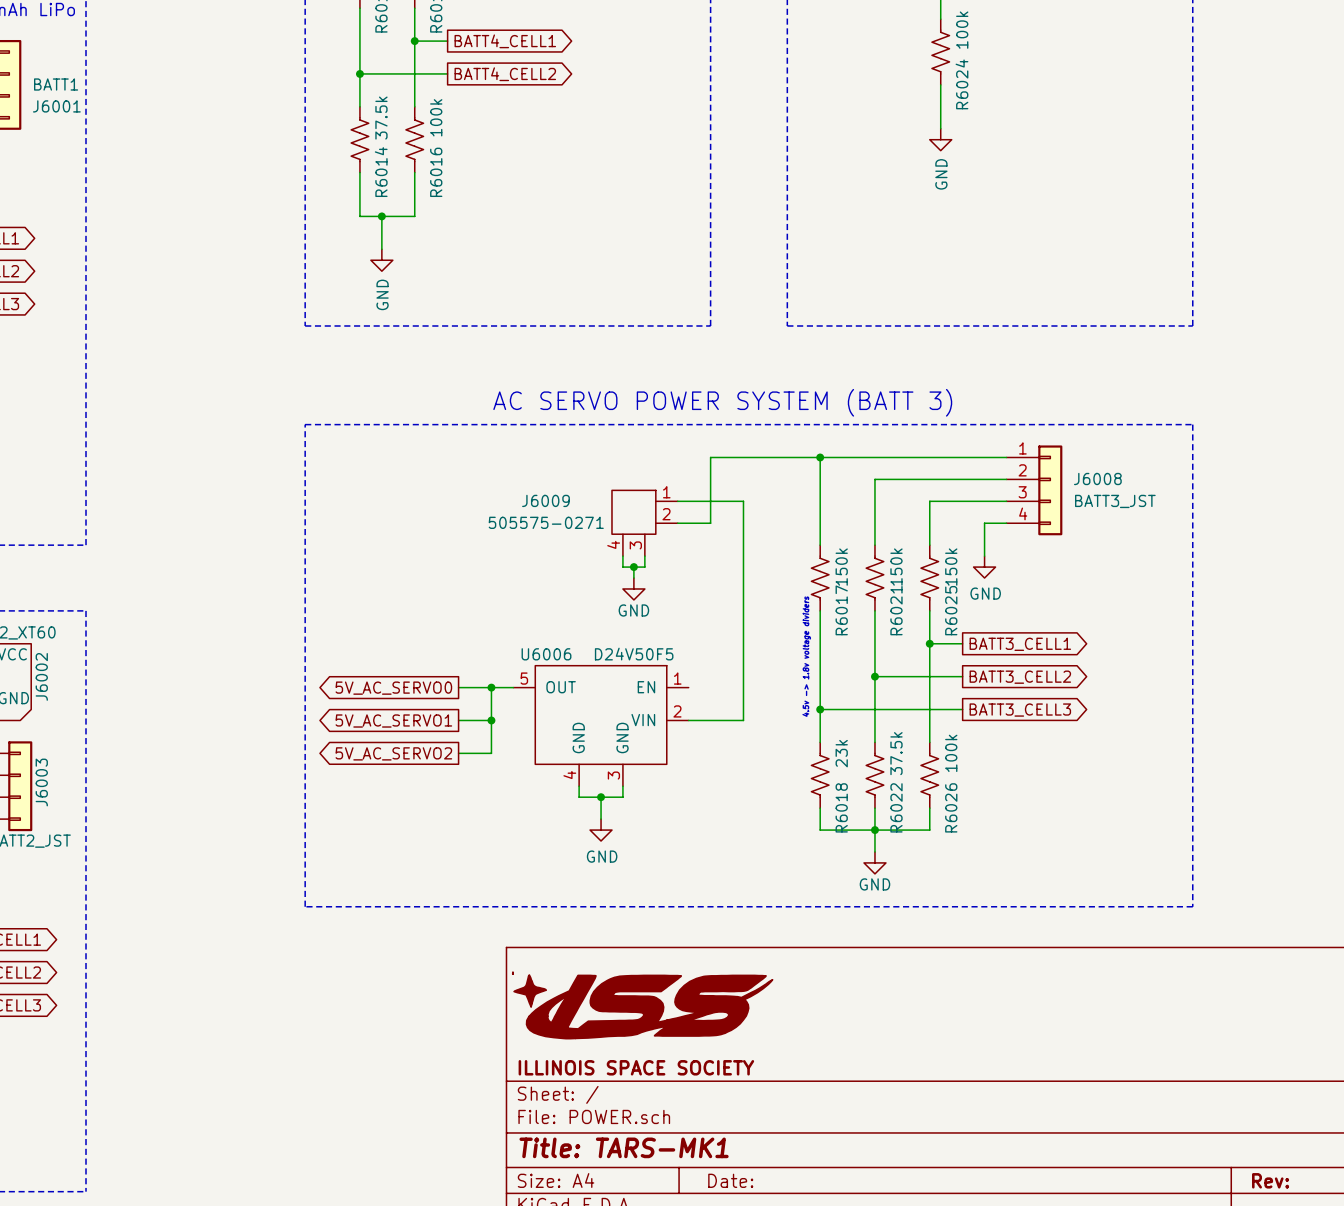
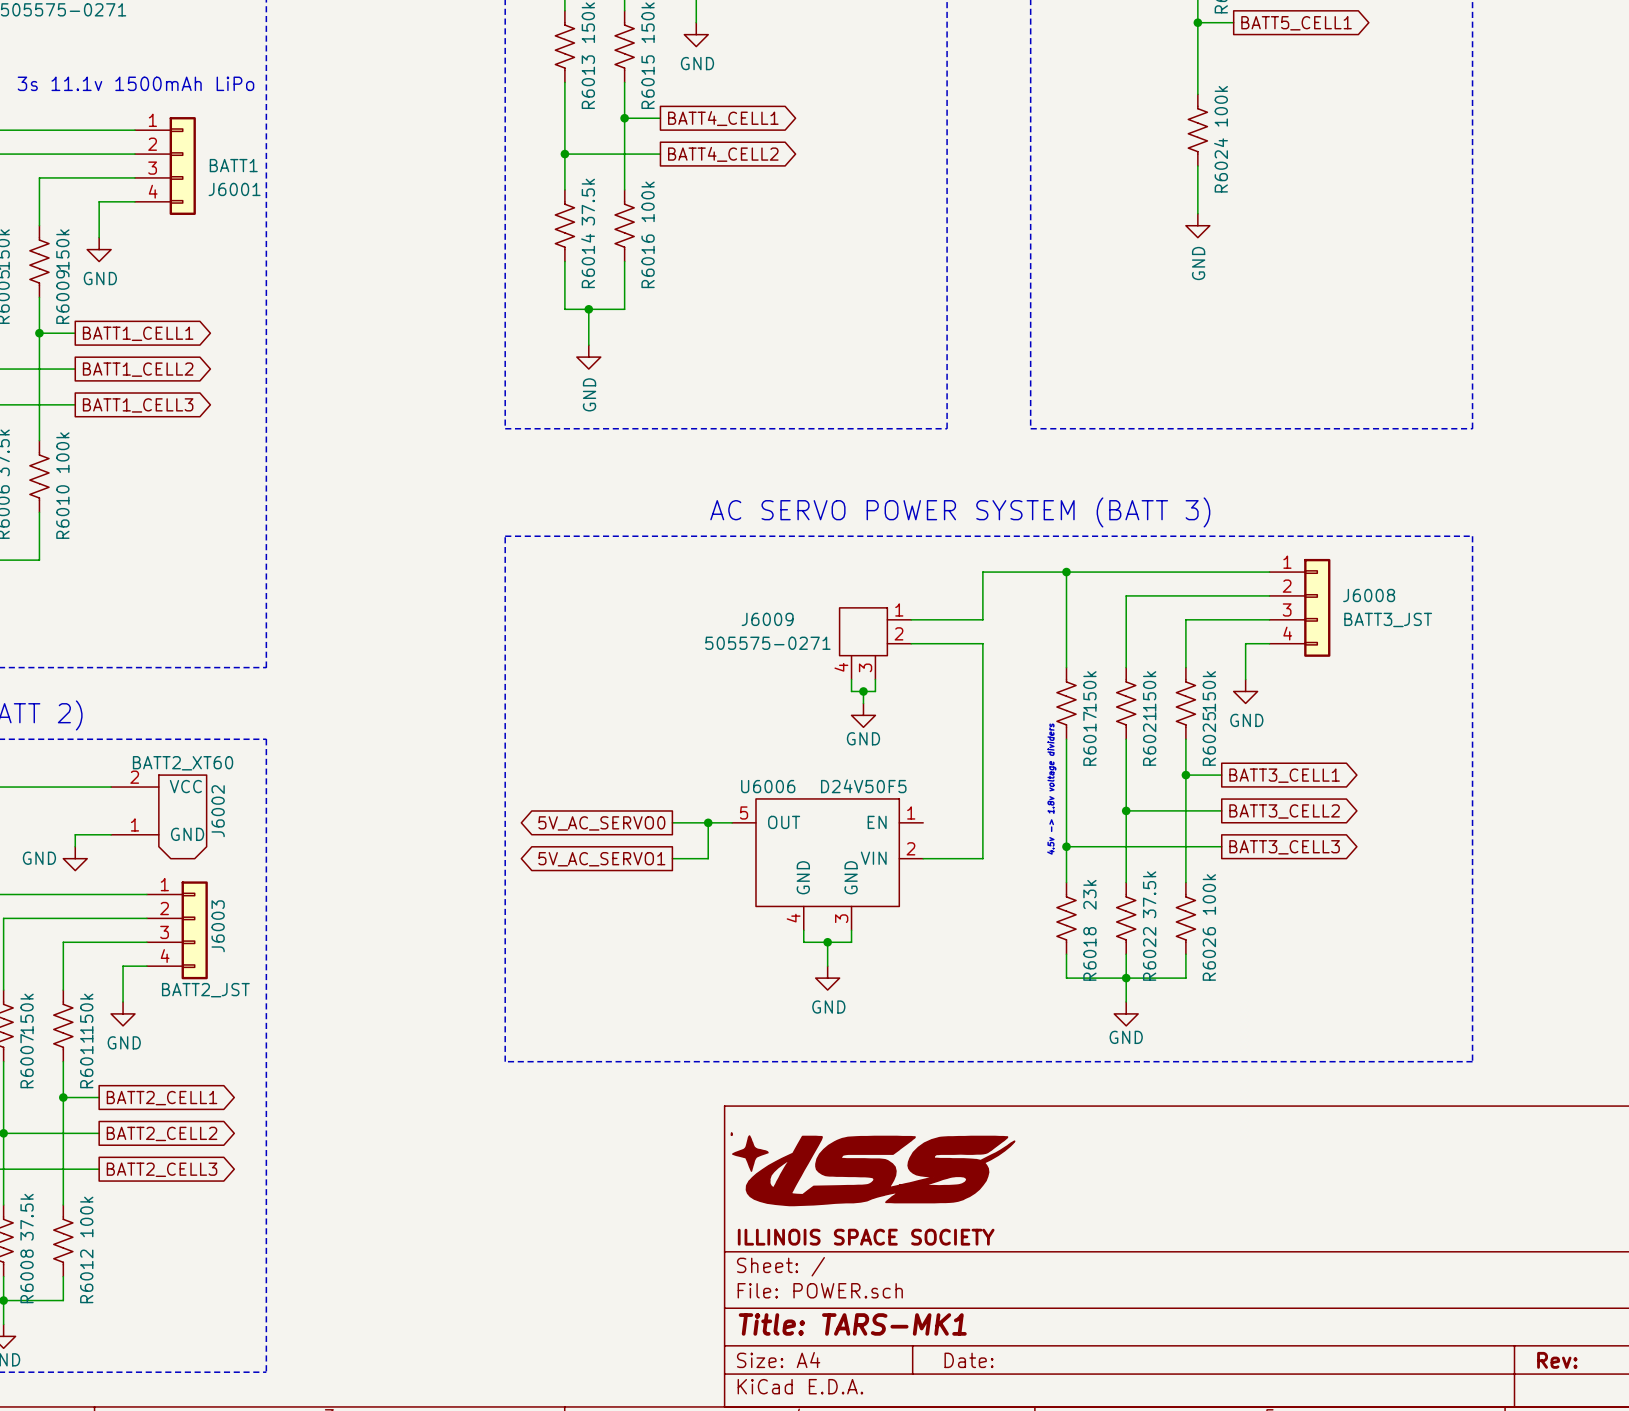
wire: (743, 457) (710, 457) (710, 523) -> (982, 572) (982, 619)
wire: (743, 501) (743, 523) -> (947, 643) (982, 643)
wire: (491, 720) (491, 753) (458, 753) -> none
junction: (491, 720) -> none
global label: 5V_AC_SERVO2 (393, 753) -> none

